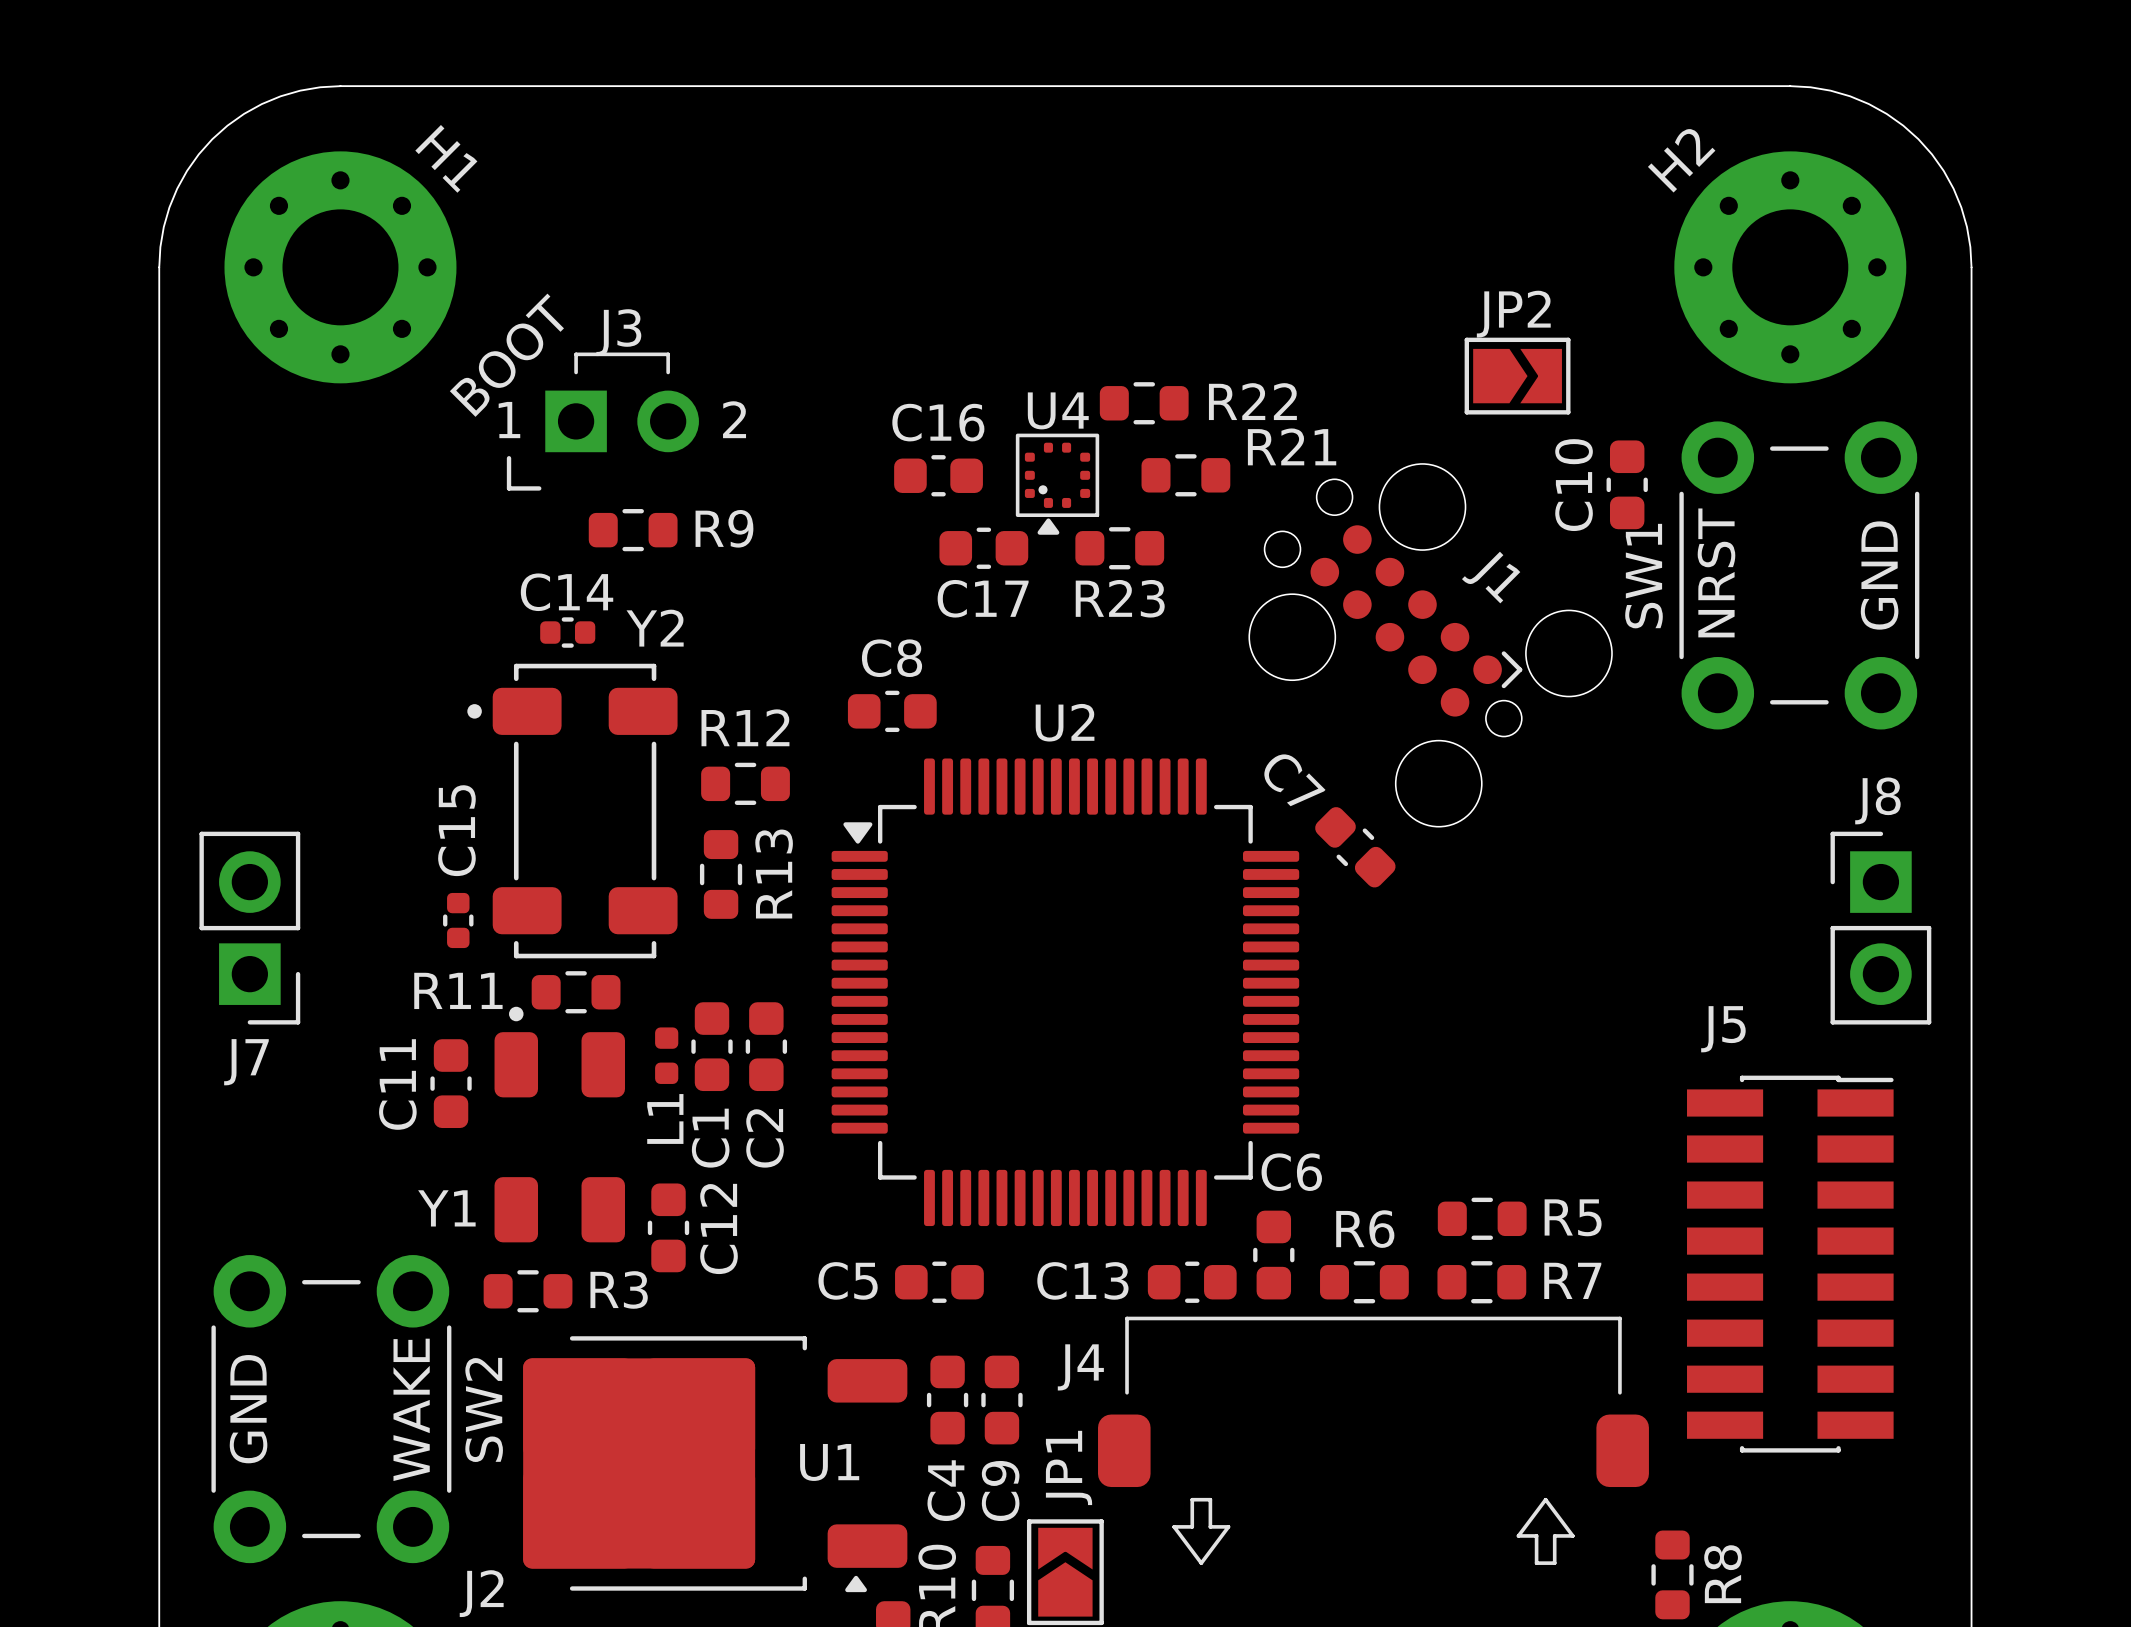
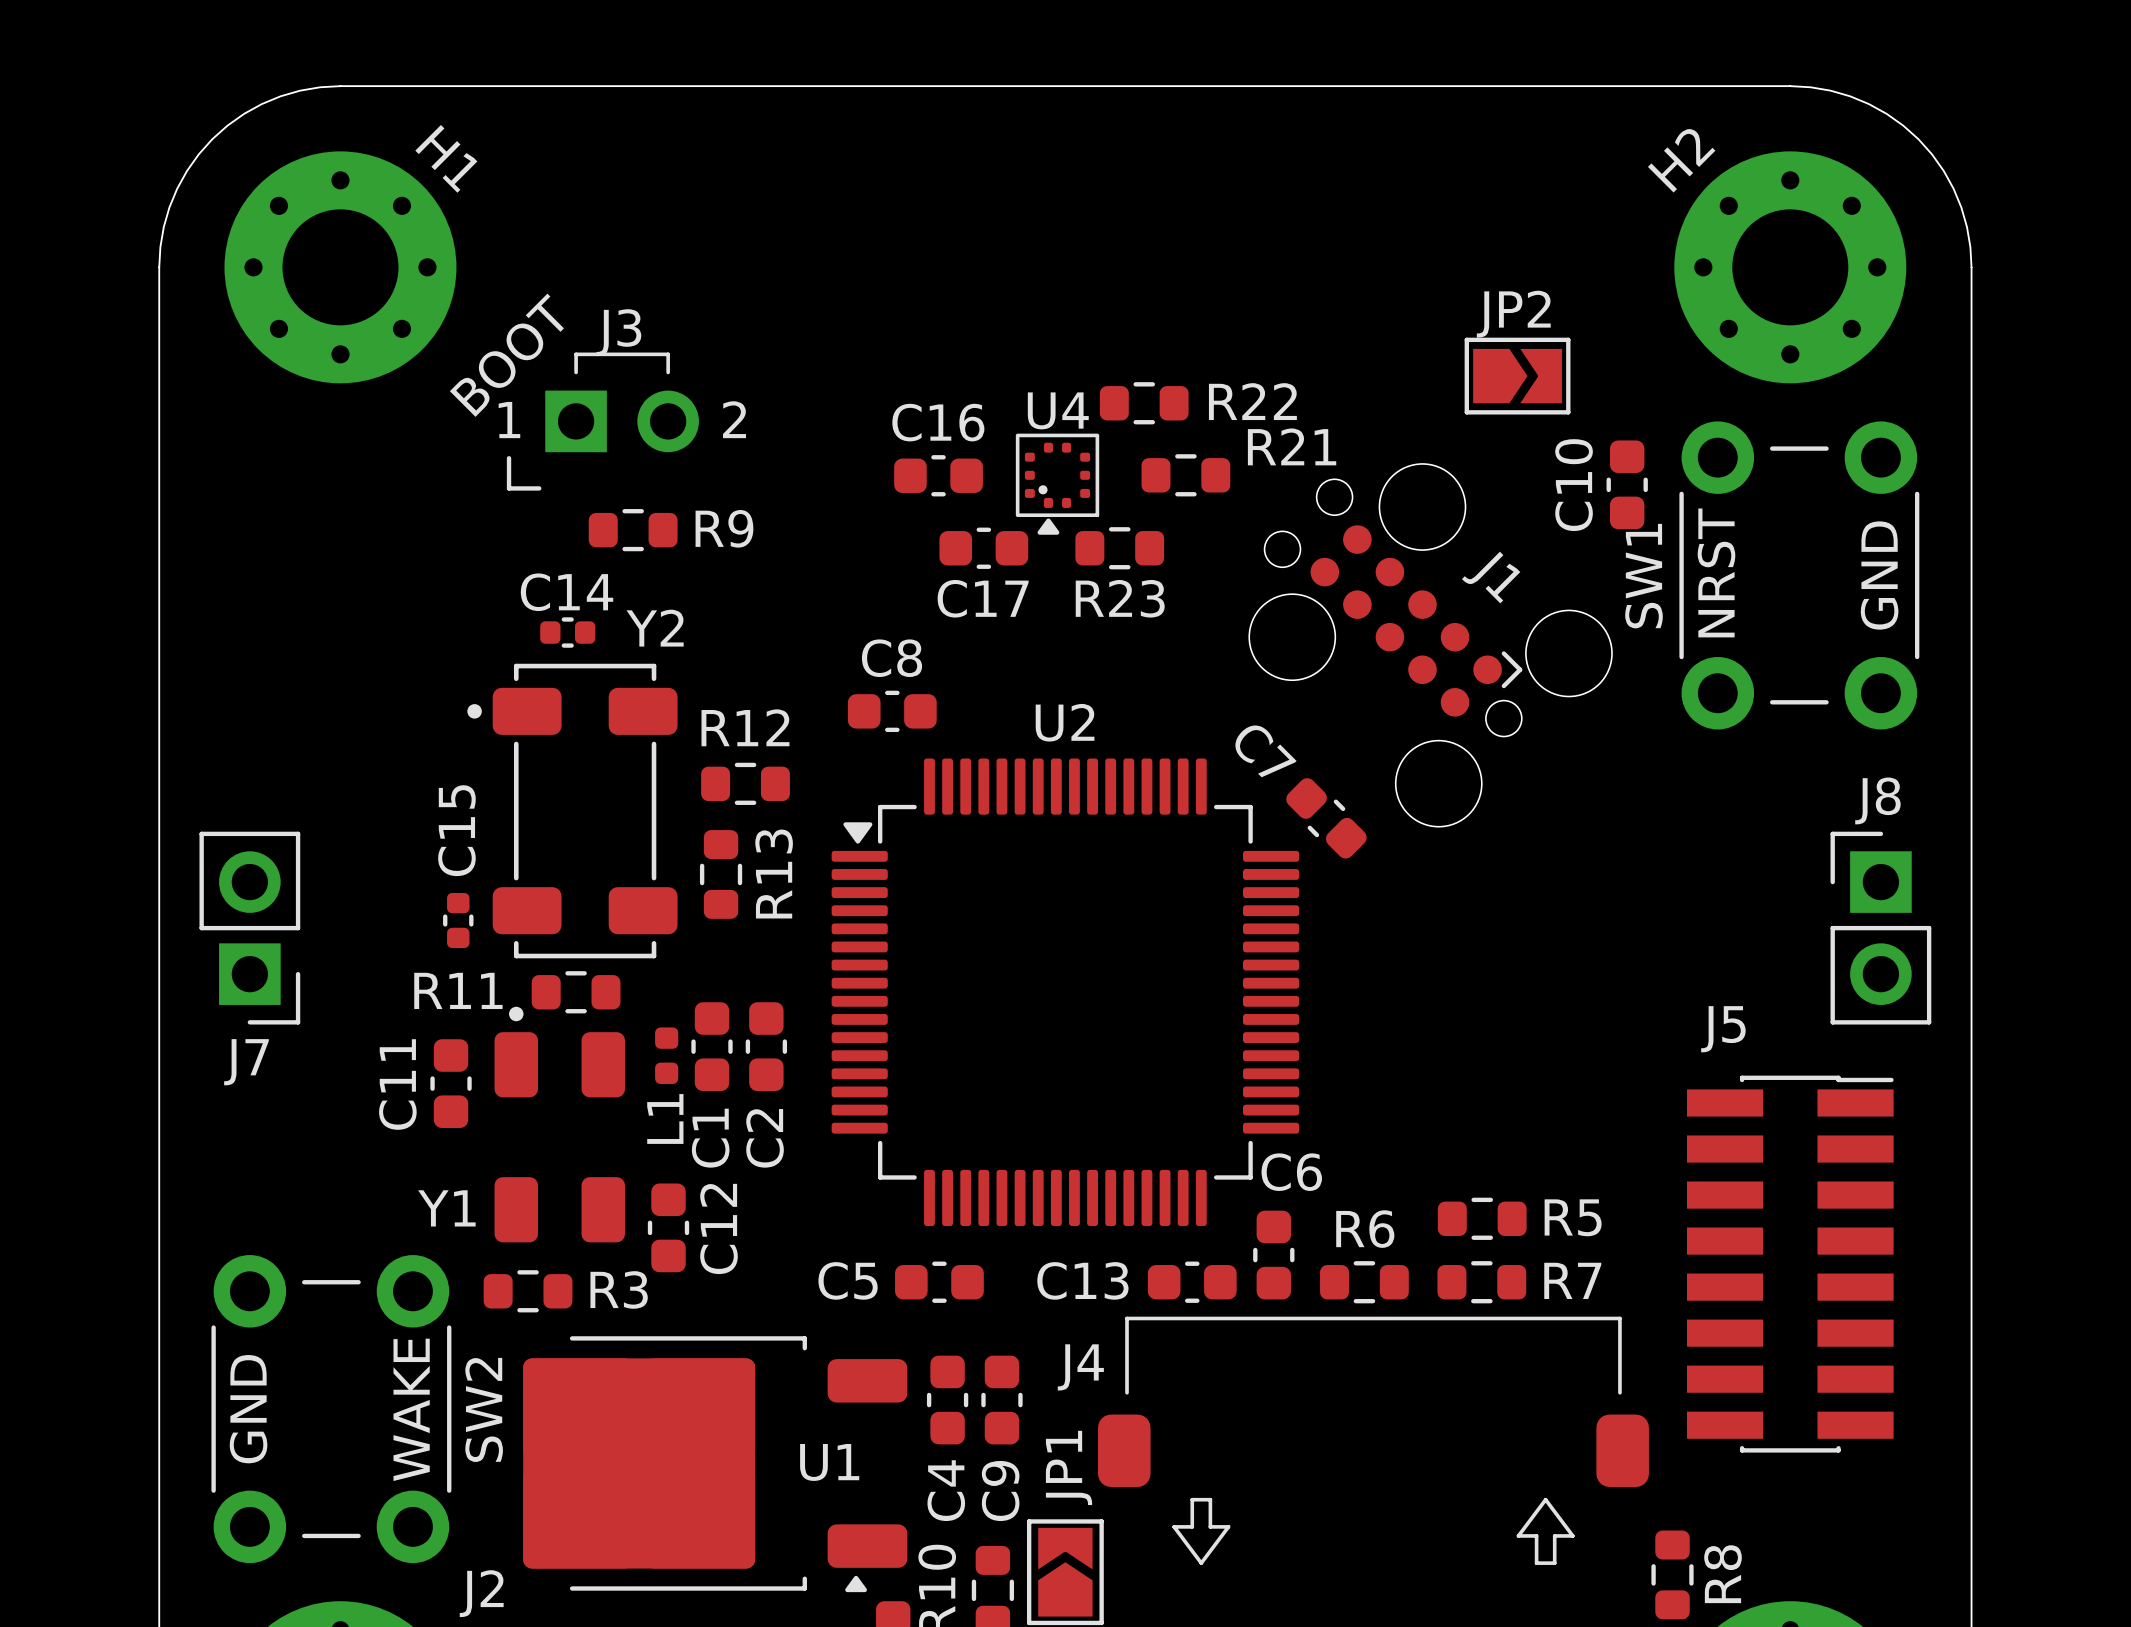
C7 position: (1355, 847) -> (1326, 818)

